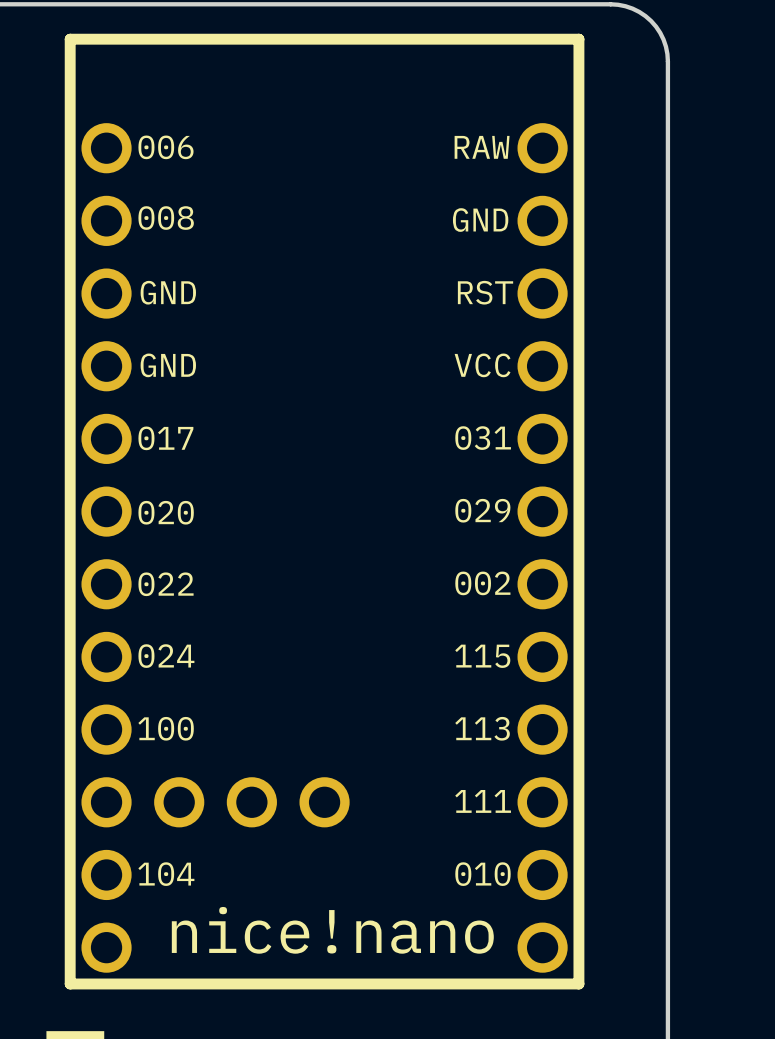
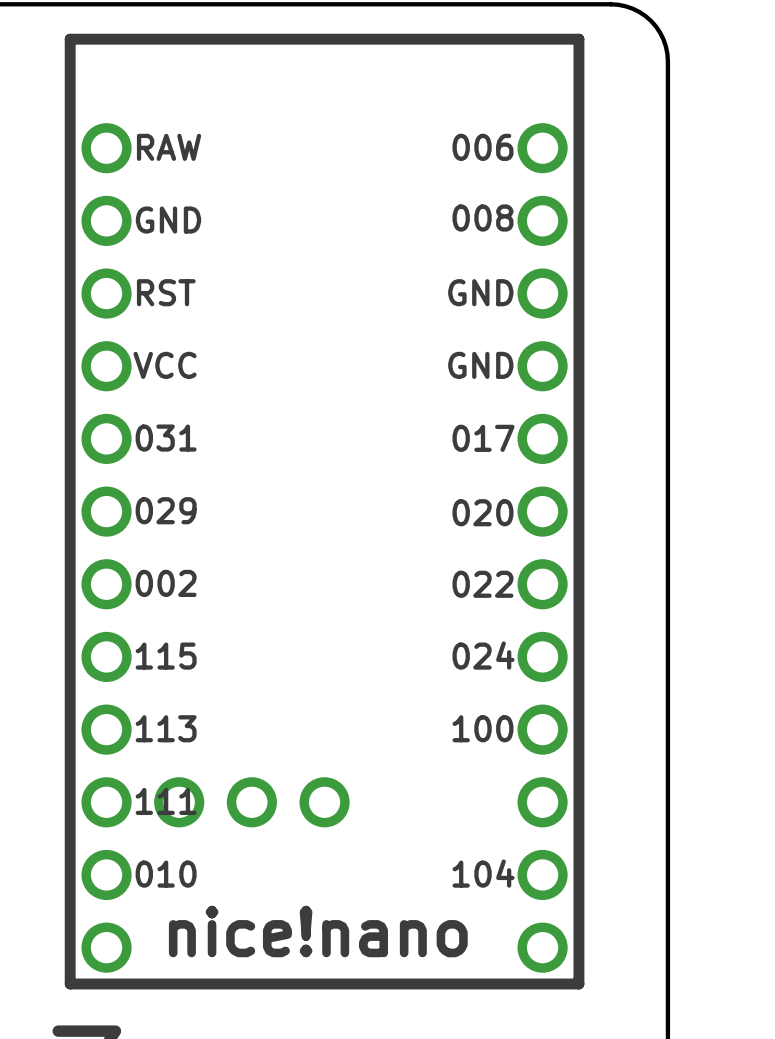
part footprint: [64, 33, 585, 990] -> [64, 33, 585, 990]

